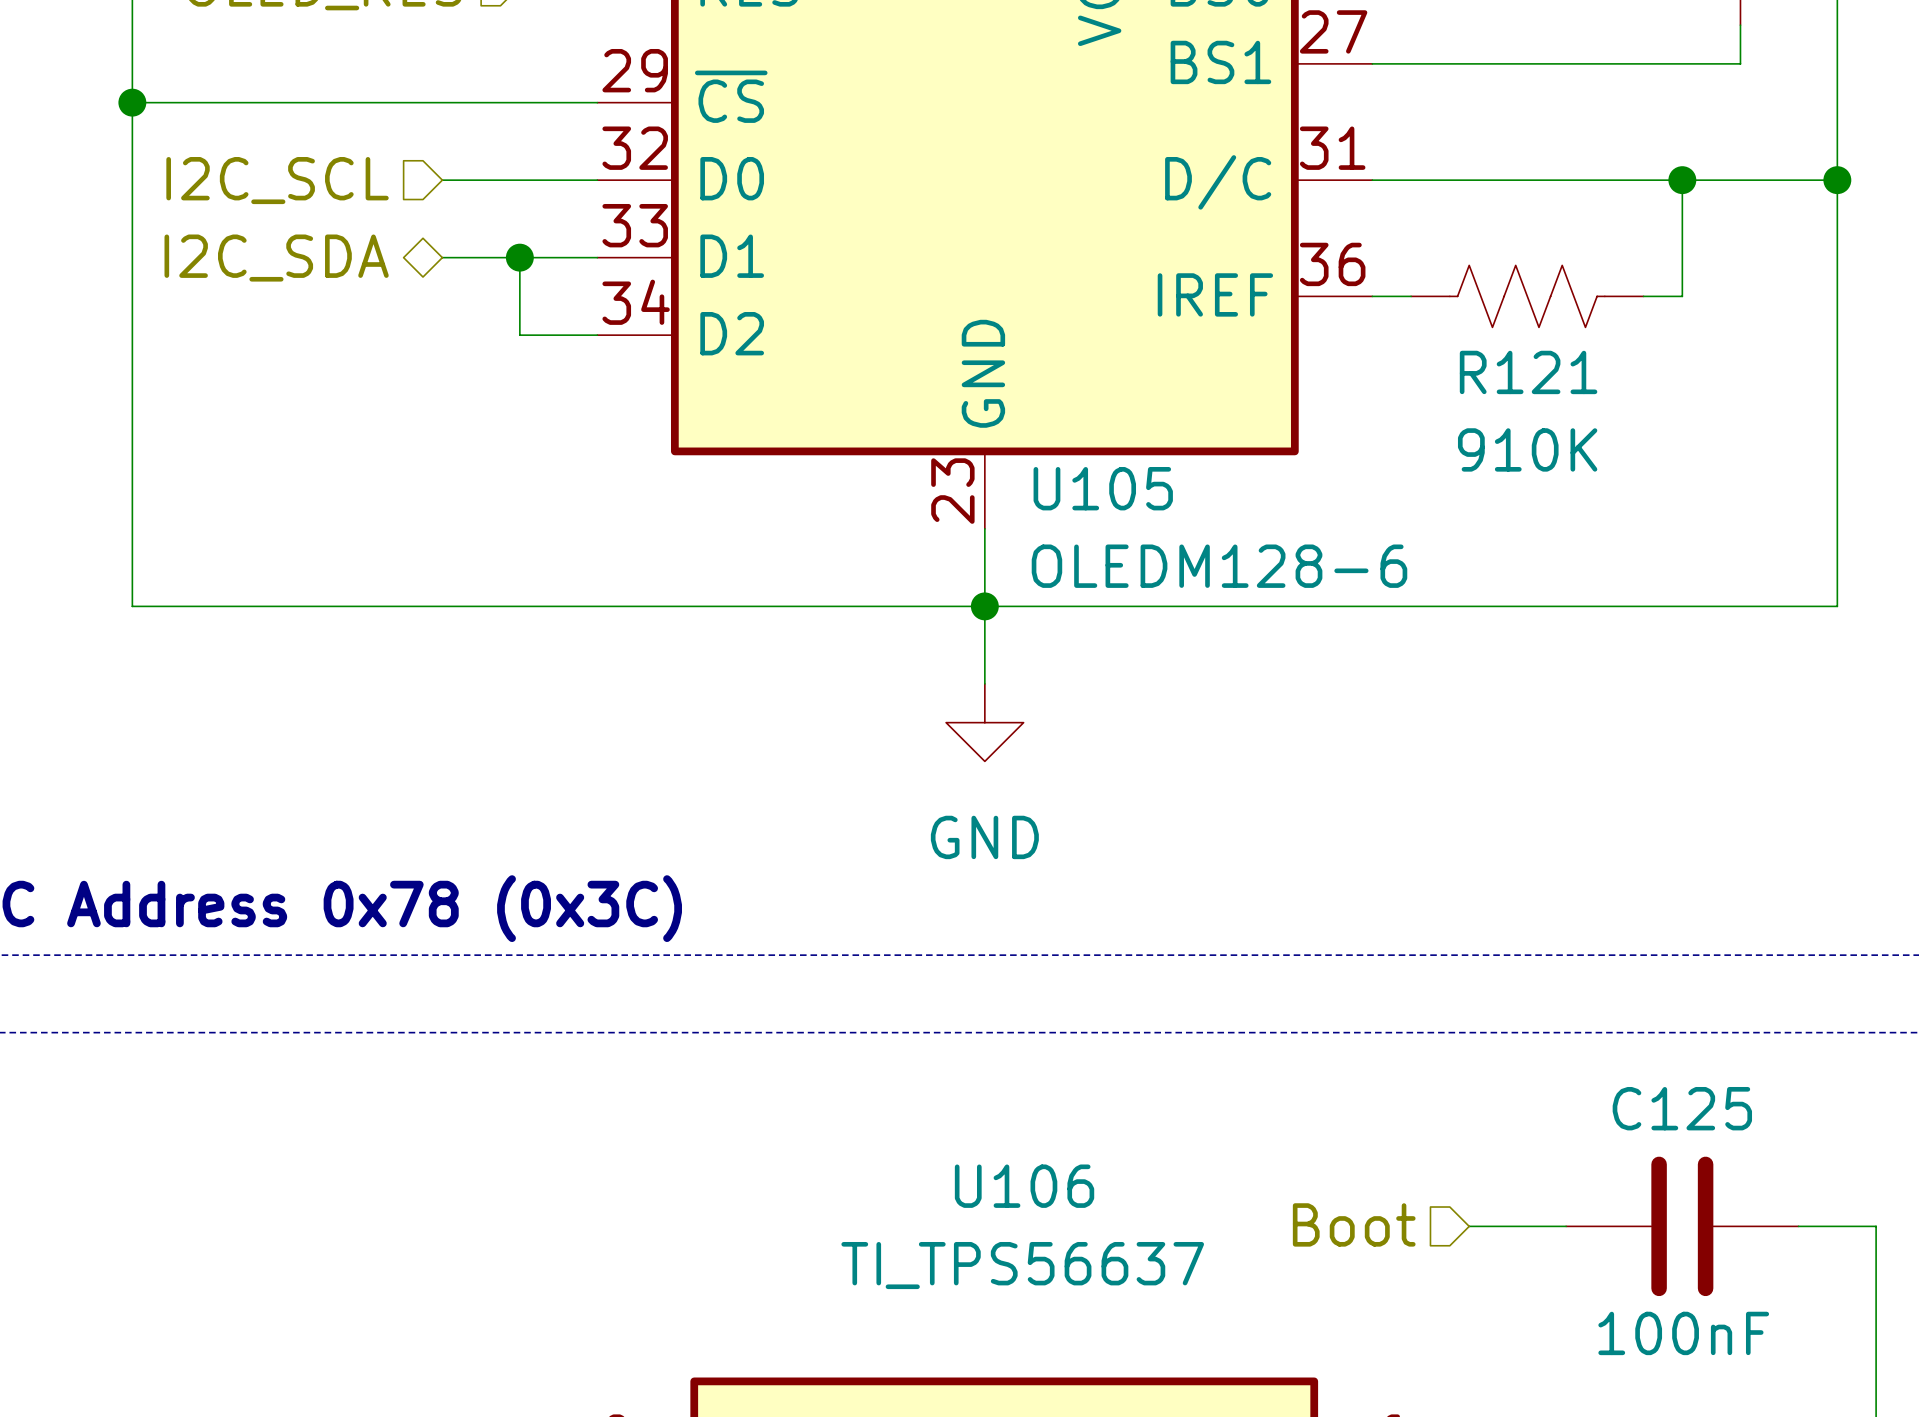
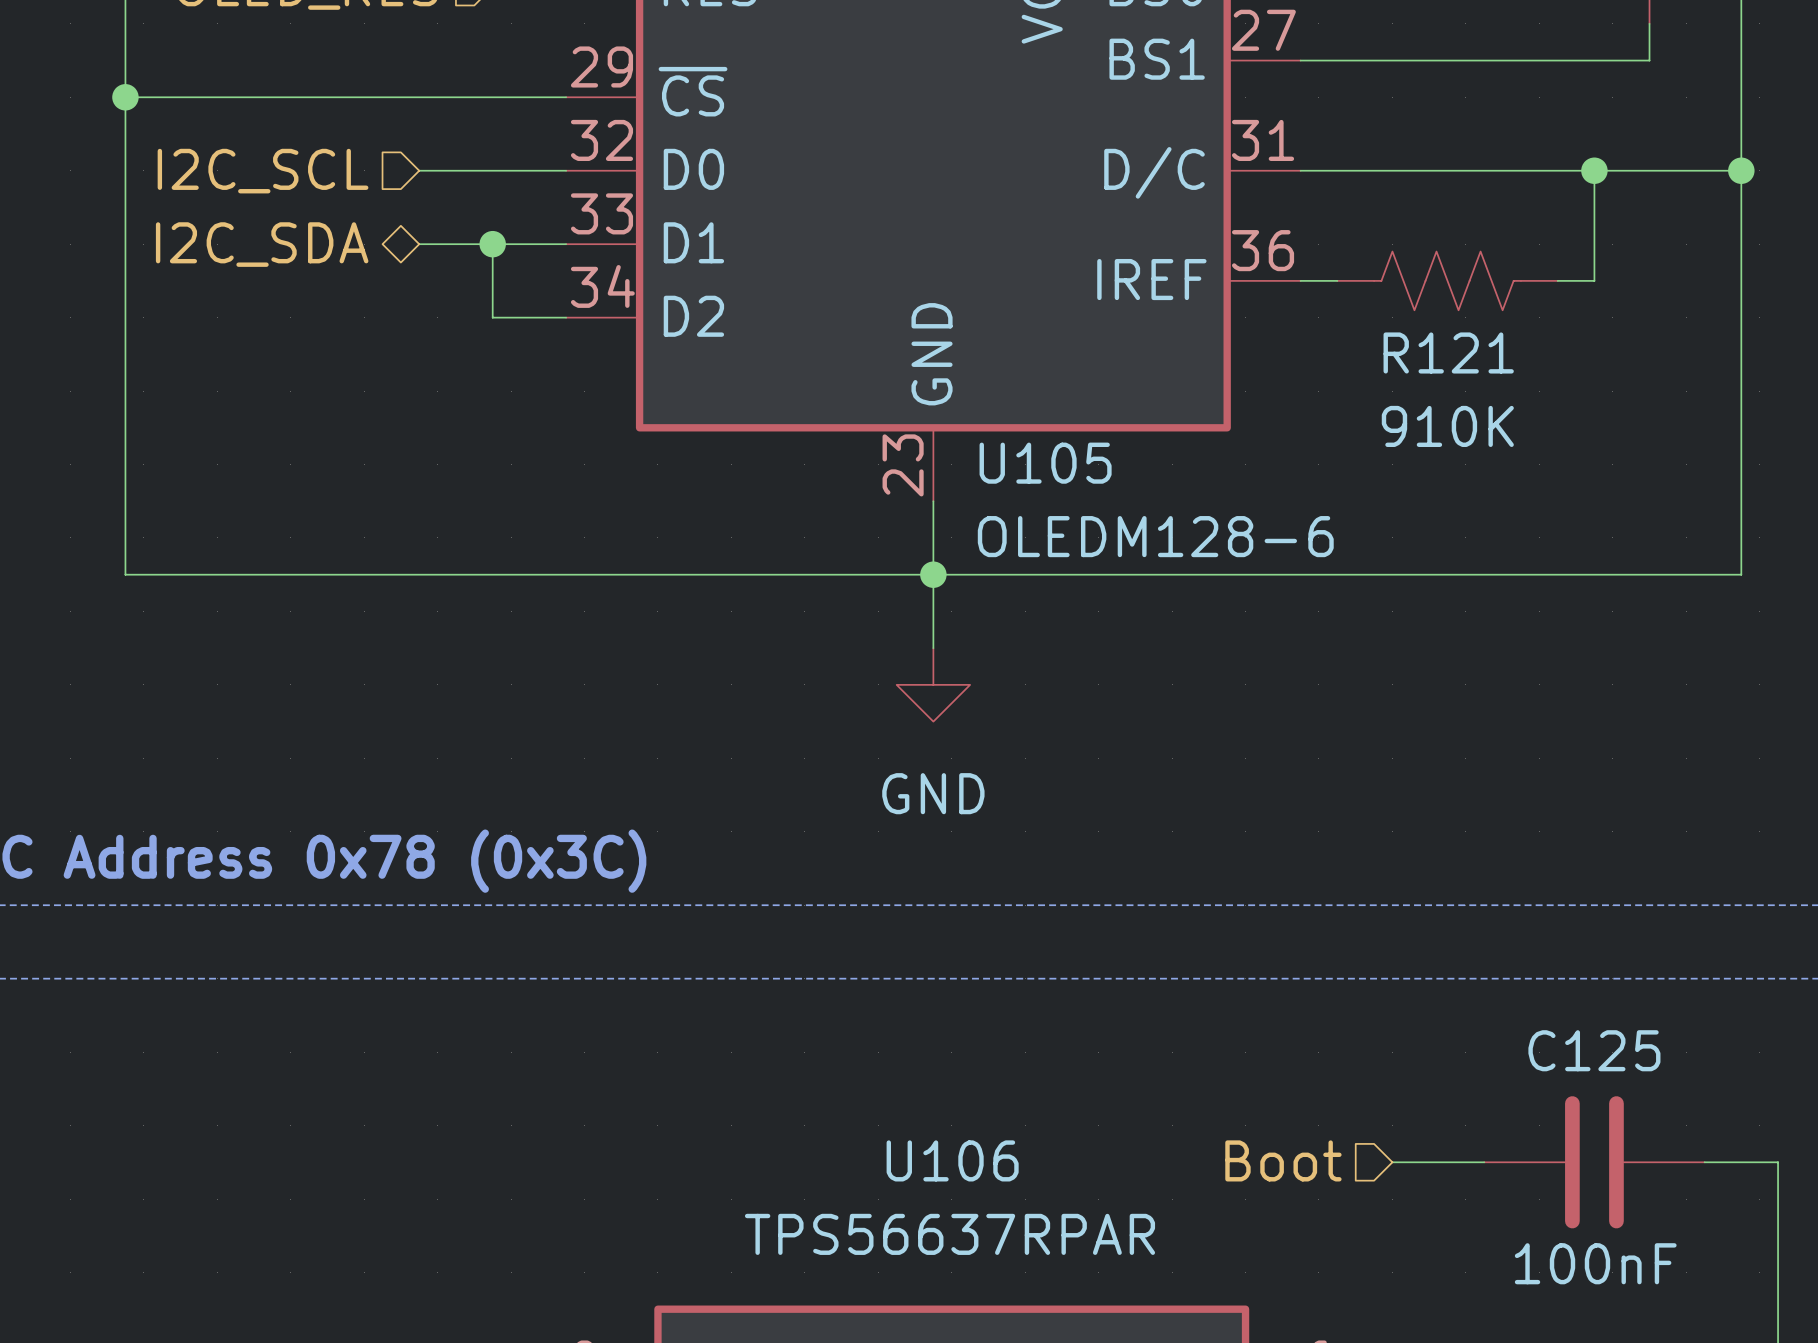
U106 name position: U106 (1024, 1186) -> U106 (952, 1160)
U106 value: TI_TPS56637 (1022, 1265) -> TPS56637RPAR (950, 1234)

